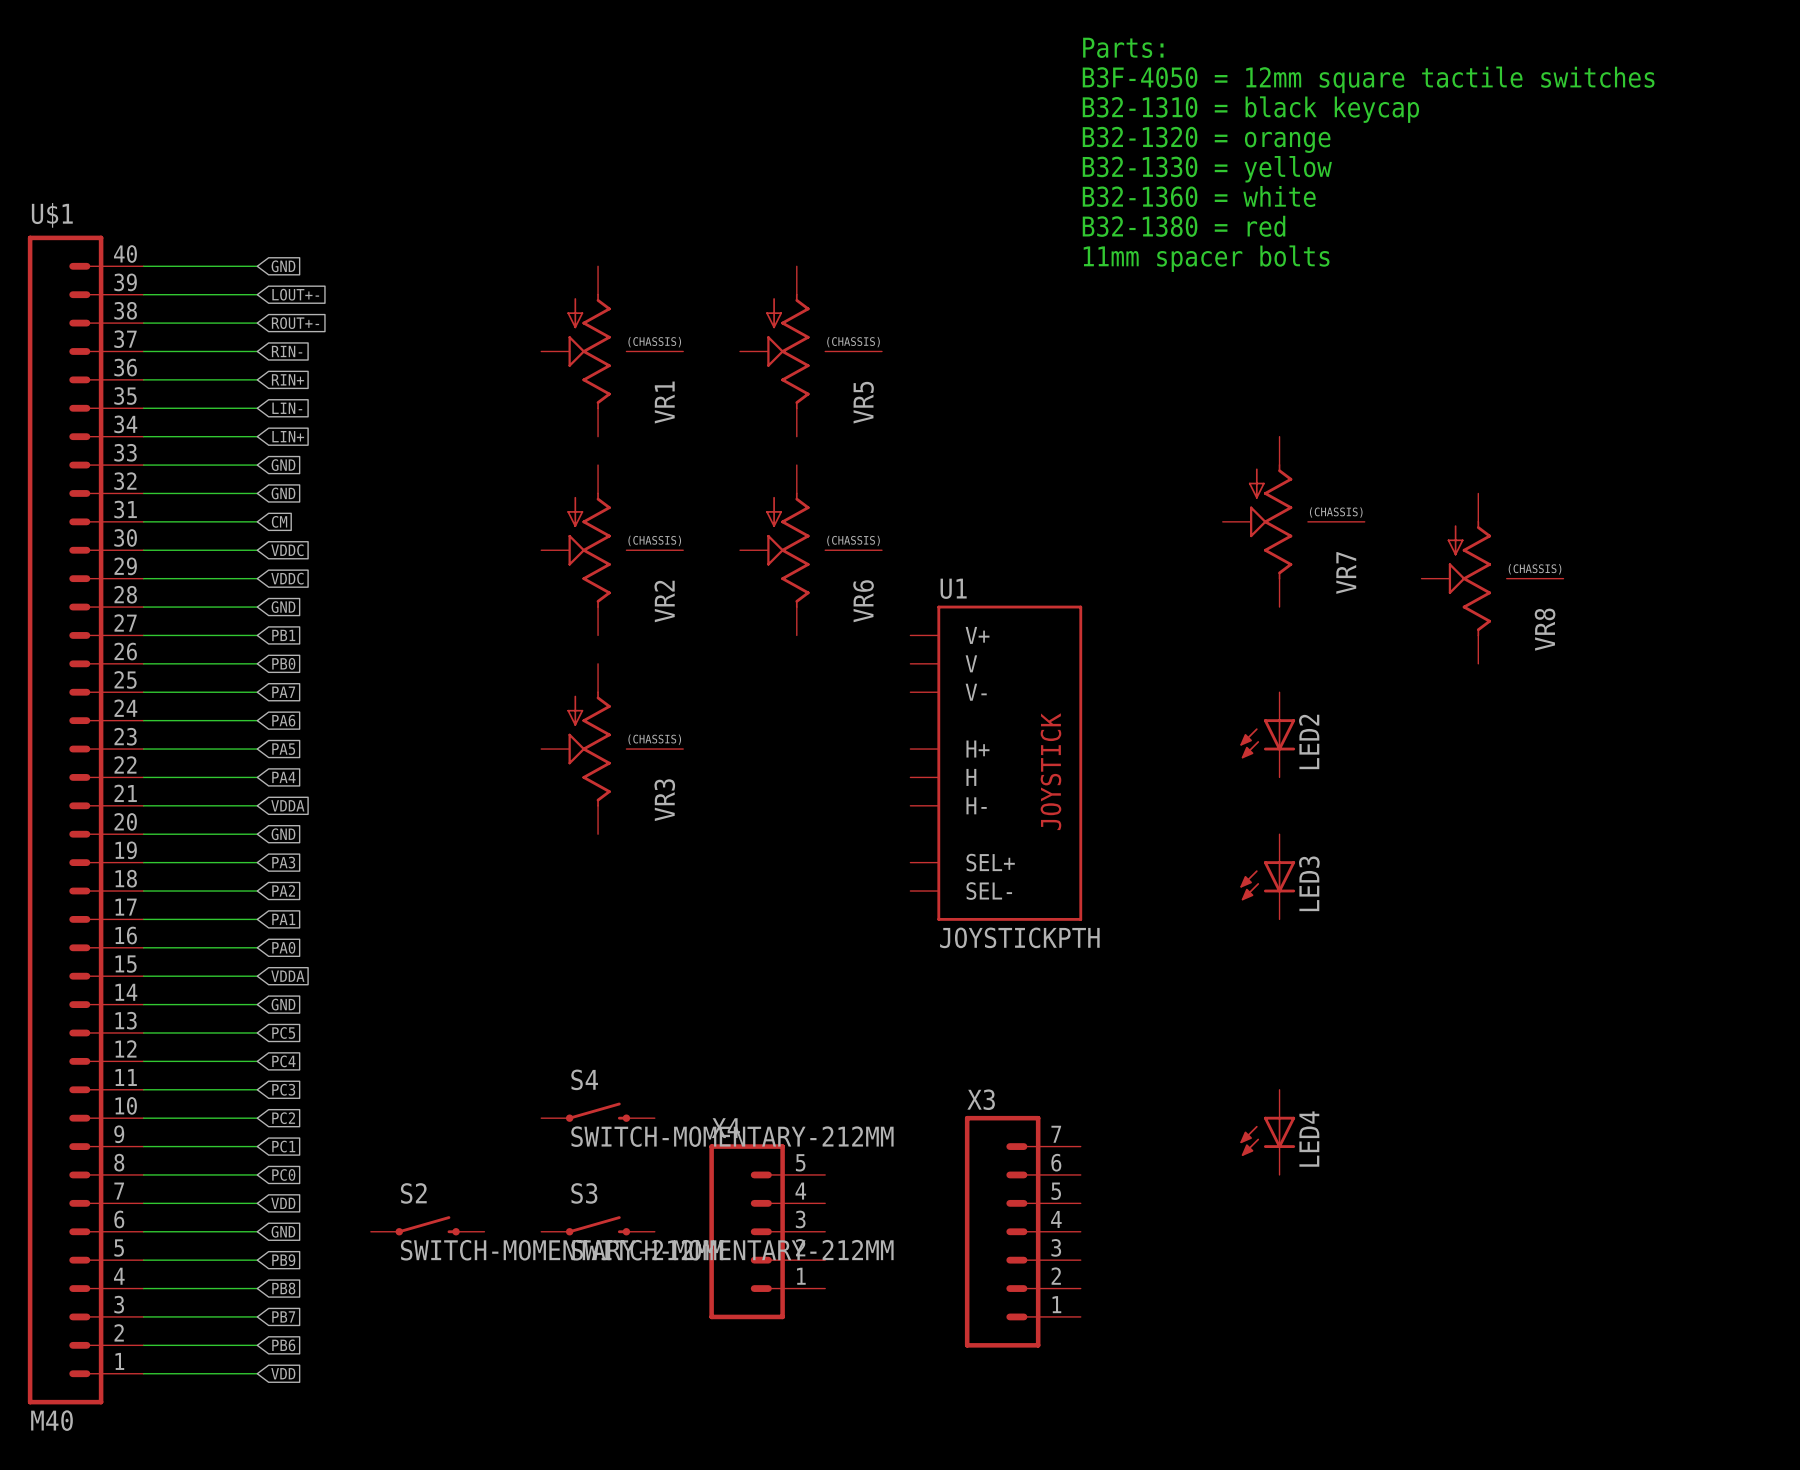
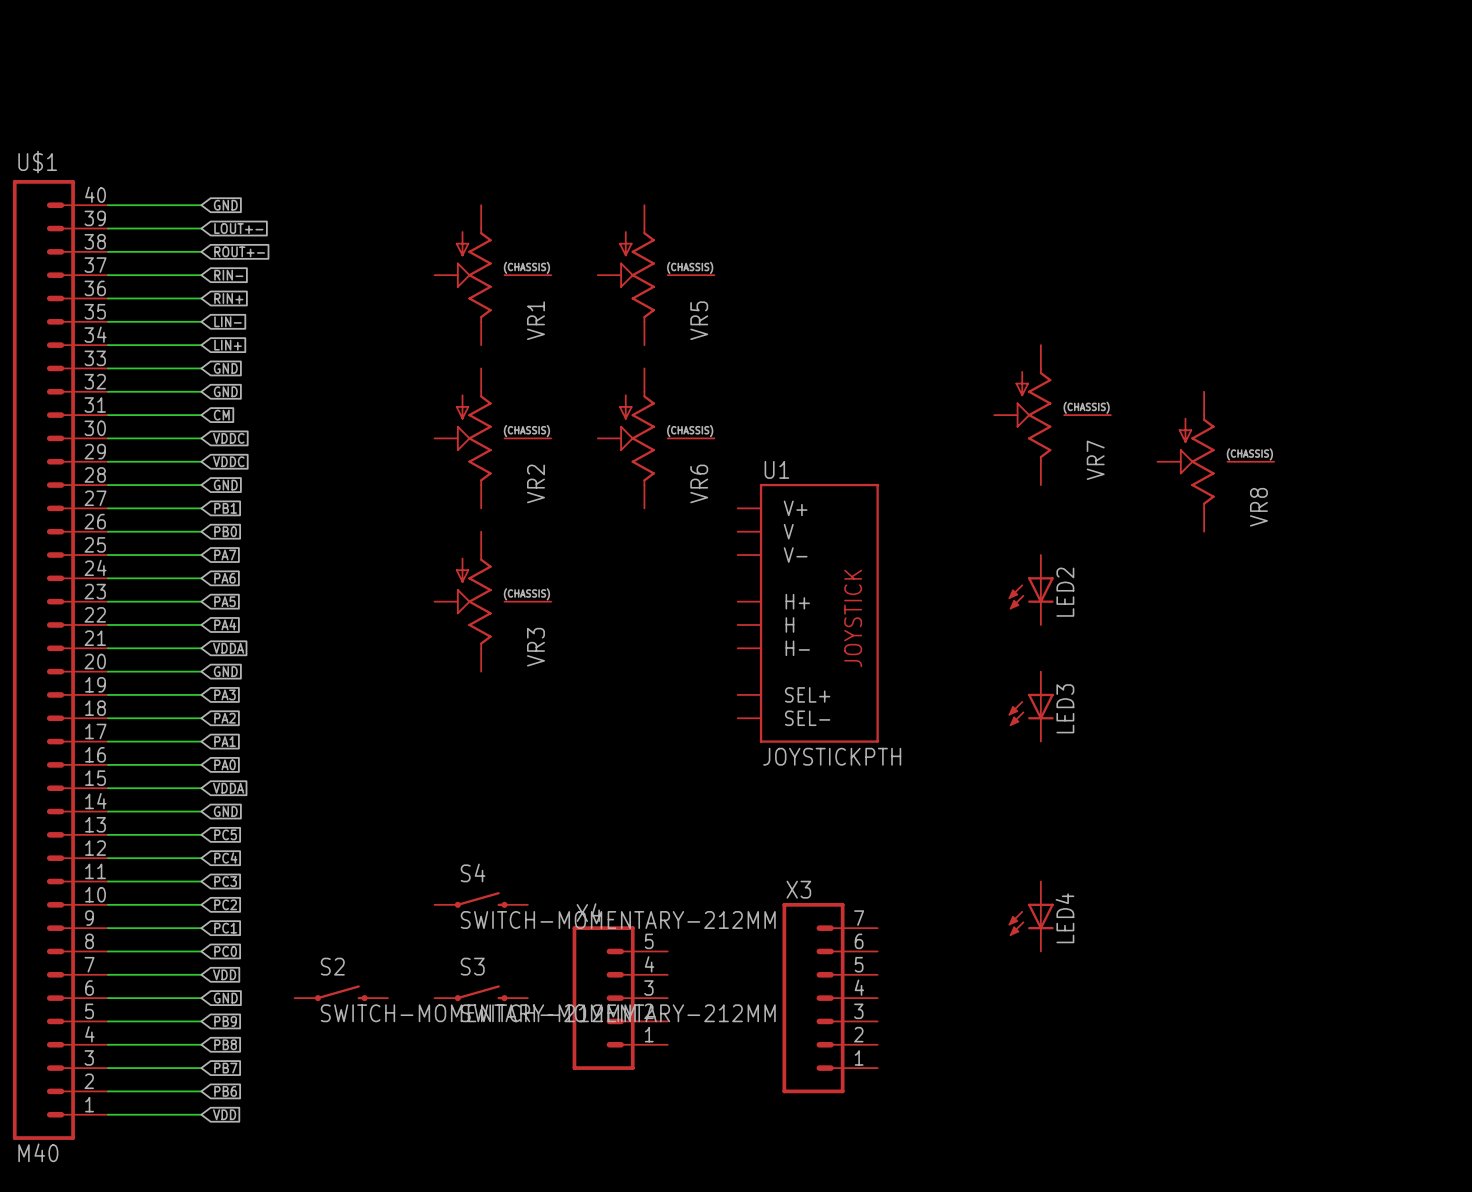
text: Parts: (1123, 47) -> none
text: B3F-4050 = 12mm square tactile switches (1368, 79) -> none
text: B32-1310 = black keycap (1250, 109) -> none
text: B32-1320 = orange (1206, 139) -> none
text: B32-1330 = yellow (1207, 169) -> none
text: B32-1360 = white (1199, 196) -> none
text: B32-1380 = red (1184, 226) -> none
text: 11mm spacer bolts (1206, 258) -> none

